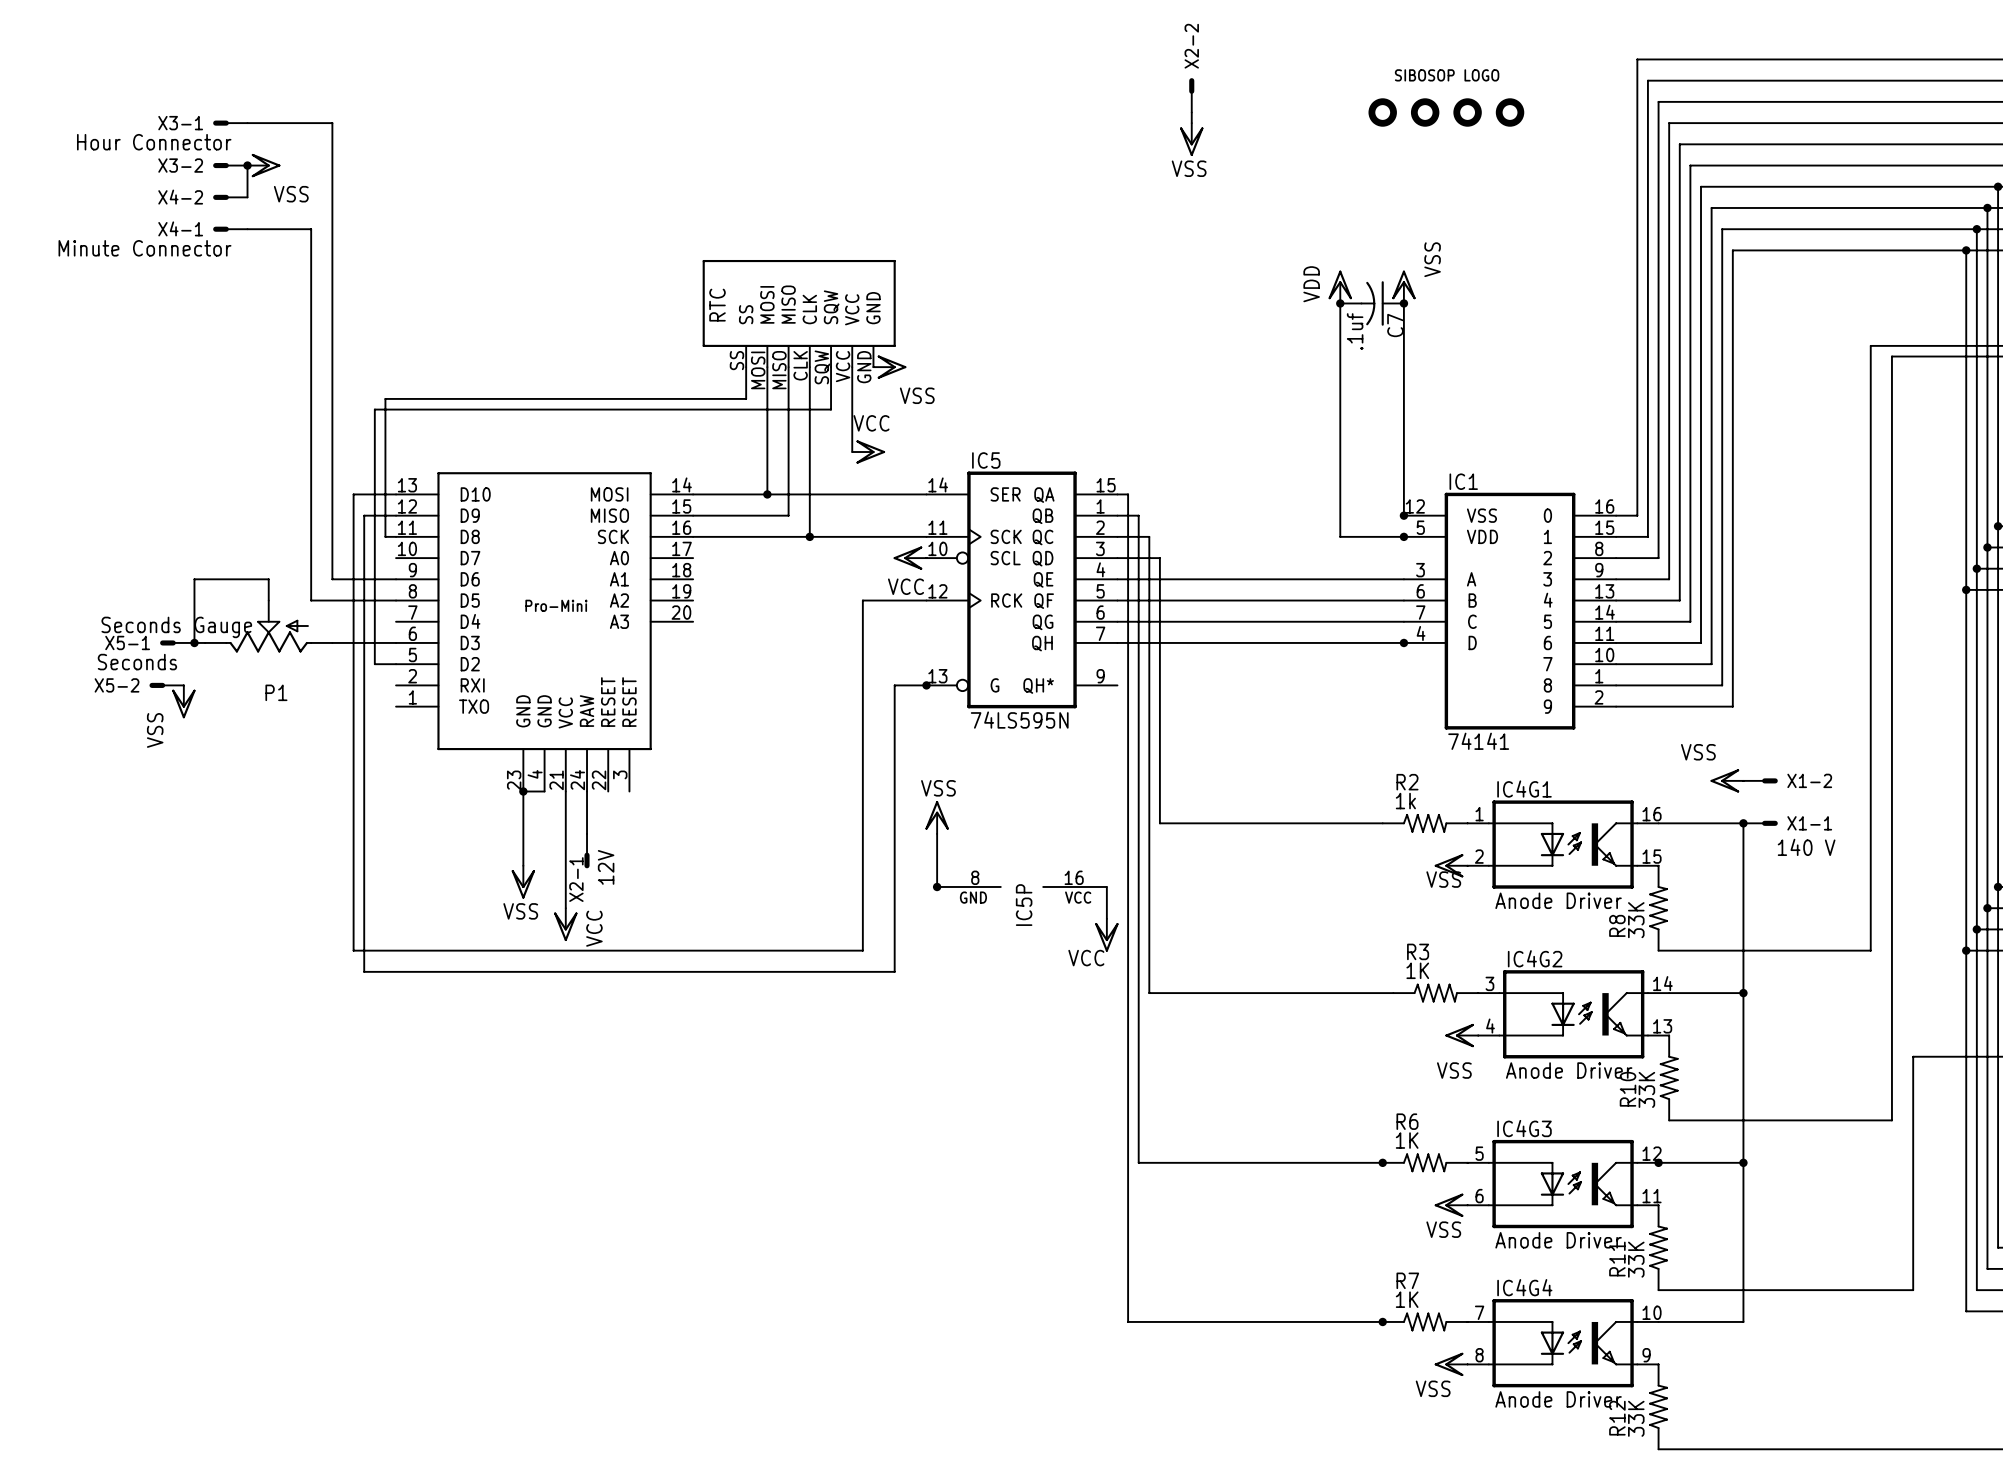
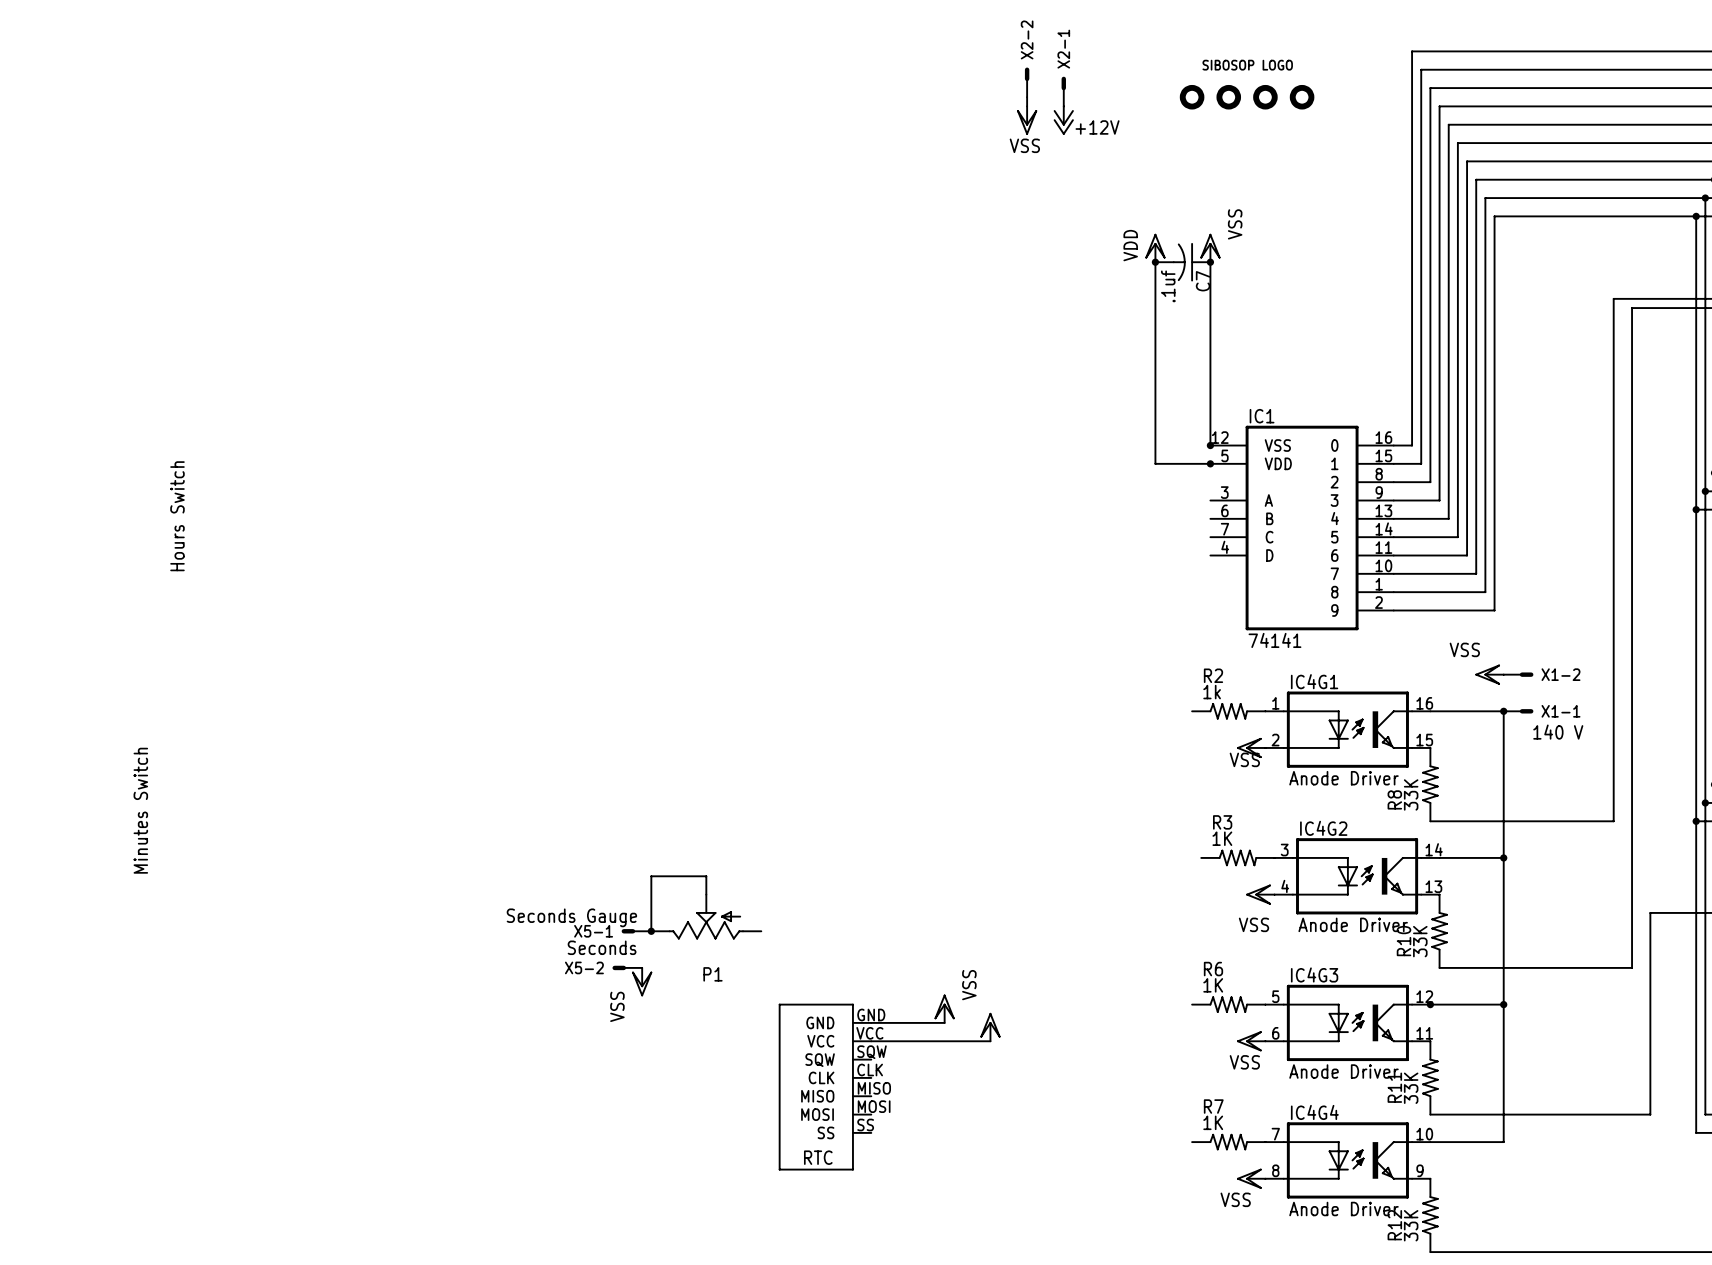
X3-1: Hour Connector (230, 123) -> none
wire: (247, 123) (332, 123) (332, 579) (396, 579) -> none
power symbol: none -> +12V (1063, 120)
X3-2: (230, 165) -> none
wire: (247, 165) (247, 197) -> none
junction: (247, 165) -> none
power symbol: VSS (263, 165) -> none
X4-2: (230, 197) -> none
X4-1: Minute Connector (230, 229) -> none
wire: (247, 229) (311, 229) (311, 600) (396, 600) -> none
part: (799, 313) -> none
wire: (746, 367) (746, 398) (385, 398) (385, 536) (396, 536) -> none
wire: (767, 367) (767, 494) -> none
wire: (788, 367) (788, 515) (693, 515) -> none
wire: (809, 367) (809, 536) -> none
wire: (831, 367) (831, 409) (374, 409) (374, 664) (396, 664) -> none
wire: (852, 367) (852, 452) -> none
power symbol: VSS (889, 367) -> none
power symbol: VCC (868, 452) -> none
wire: (396, 494) (353, 494) (353, 950) (862, 950) (862, 600) (926, 600) -> none
wire: (693, 494) (926, 494) -> none
junction: (767, 494) -> none
wire: (1117, 494) (1128, 494) (1128, 1321) (1382, 1321) -> none
wire: (396, 515) (364, 515) (364, 971) (894, 971) (894, 685) (926, 685) -> none
wire: (1117, 515) (1138, 515) (1138, 1162) (1382, 1162) -> none
wire: (693, 536) (926, 536) -> none
junction: (809, 536) -> none
wire: (1117, 536) (1149, 536) (1149, 993) (1393, 993) -> none
power symbol: VCC (910, 558) -> none
wire: (1117, 558) (1159, 558) (1159, 823) (1382, 823) -> none
wire: (1117, 579) (1403, 579) -> none
IC5: 74LS595N (1022, 589) -> none
text: none -> Hours Switch (177, 516)
wire: (268, 600) (268, 579) (194, 579) (194, 642) (205, 642) -> none
wire: (1117, 600) (1403, 600) -> none
wire: (1117, 621) (1403, 621) -> none
P1 position: (268, 626) -> (706, 917)
text: Seconds Gauge (176, 627) -> none
part: (544, 631) -> none
X5-1 position: (177, 642) -> (636, 931)
junction: (194, 642) -> none
wire: (332, 642) (396, 642) -> none
wire: (1117, 642) (1403, 642) -> none
junction: (1403, 642) -> none
X5-2 position: (166, 685) -> (627, 967)
junction: (926, 685) -> none
power symbol: VSS (183, 701) -> none
junction: (523, 791) -> none
wire: (544, 791) (523, 791) (523, 865) -> none
wire: (565, 791) (565, 908) -> none
wire: (587, 791) (587, 833) -> none
power symbol: VSS (937, 817) -> none
wire: (937, 833) (937, 886) -> none
X2-1 position: (587, 851) -> (1063, 91)
X2-1 rotation: 0° (587, 860) -> 180° (1063, 83)
X2-1 value: 12V (606, 867) -> none
X2-1 name position: X2-1 (576, 879) -> X2-1 (1063, 49)
power symbol: VSS (523, 882) -> none
junction: (937, 886) -> none
IC5P: (1022, 886) -> none
wire: (1106, 886) (1106, 918) -> none
power symbol: VCC (565, 924) -> none
power symbol: VCC (1106, 935) -> none
text: none -> Minutes Switch (140, 810)
wire: none -> (706, 894) (706, 876) (651, 876) (651, 931)
text: none -> Seconds Gauge (571, 917)
junction: none -> (651, 931)
power symbol: none -> VSS (642, 982)
junction: (1382, 1162) -> none
power symbol: none -> VSS (944, 1008)
wire: none -> (871, 1022) (944, 1022)
power symbol: none -> (990, 1027)
wire: none -> (871, 1041) (990, 1041)
part: none -> (825, 1087)
junction: (1382, 1321) -> none

